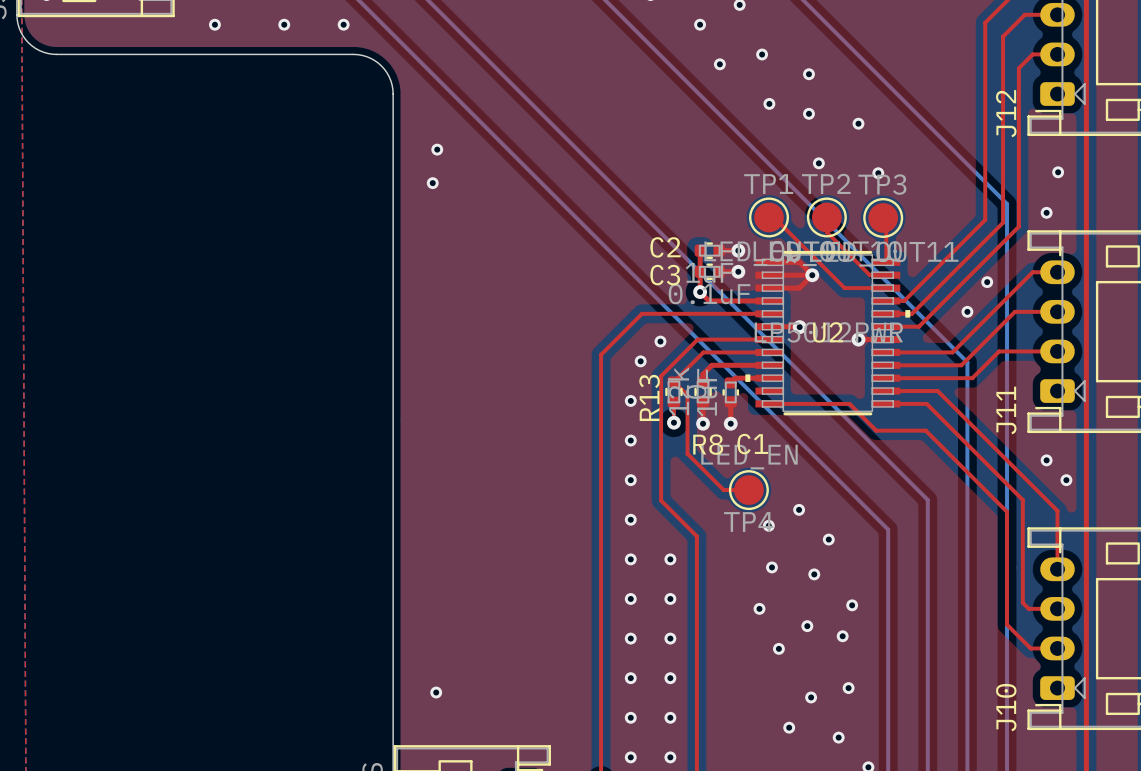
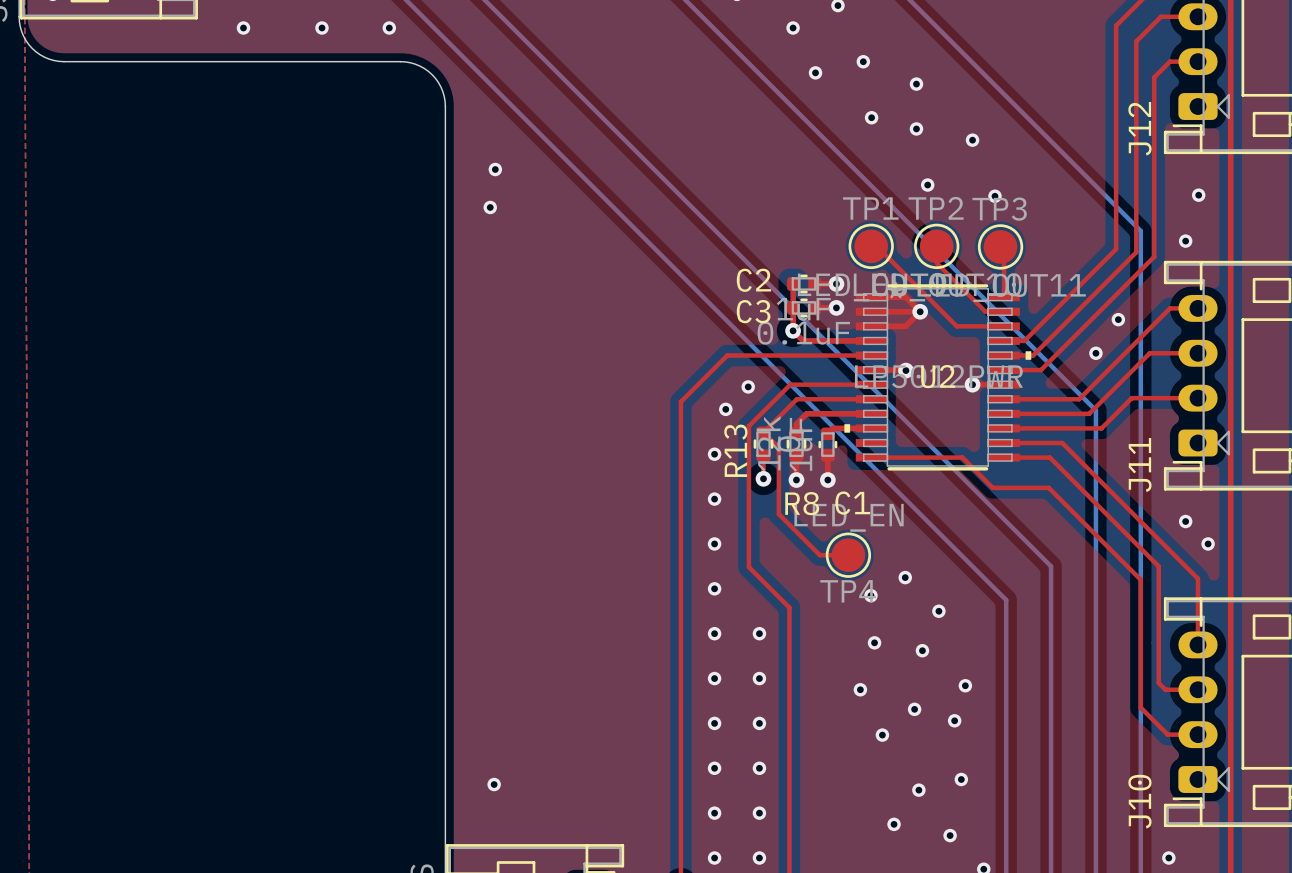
via: none -> (1168, 858)

